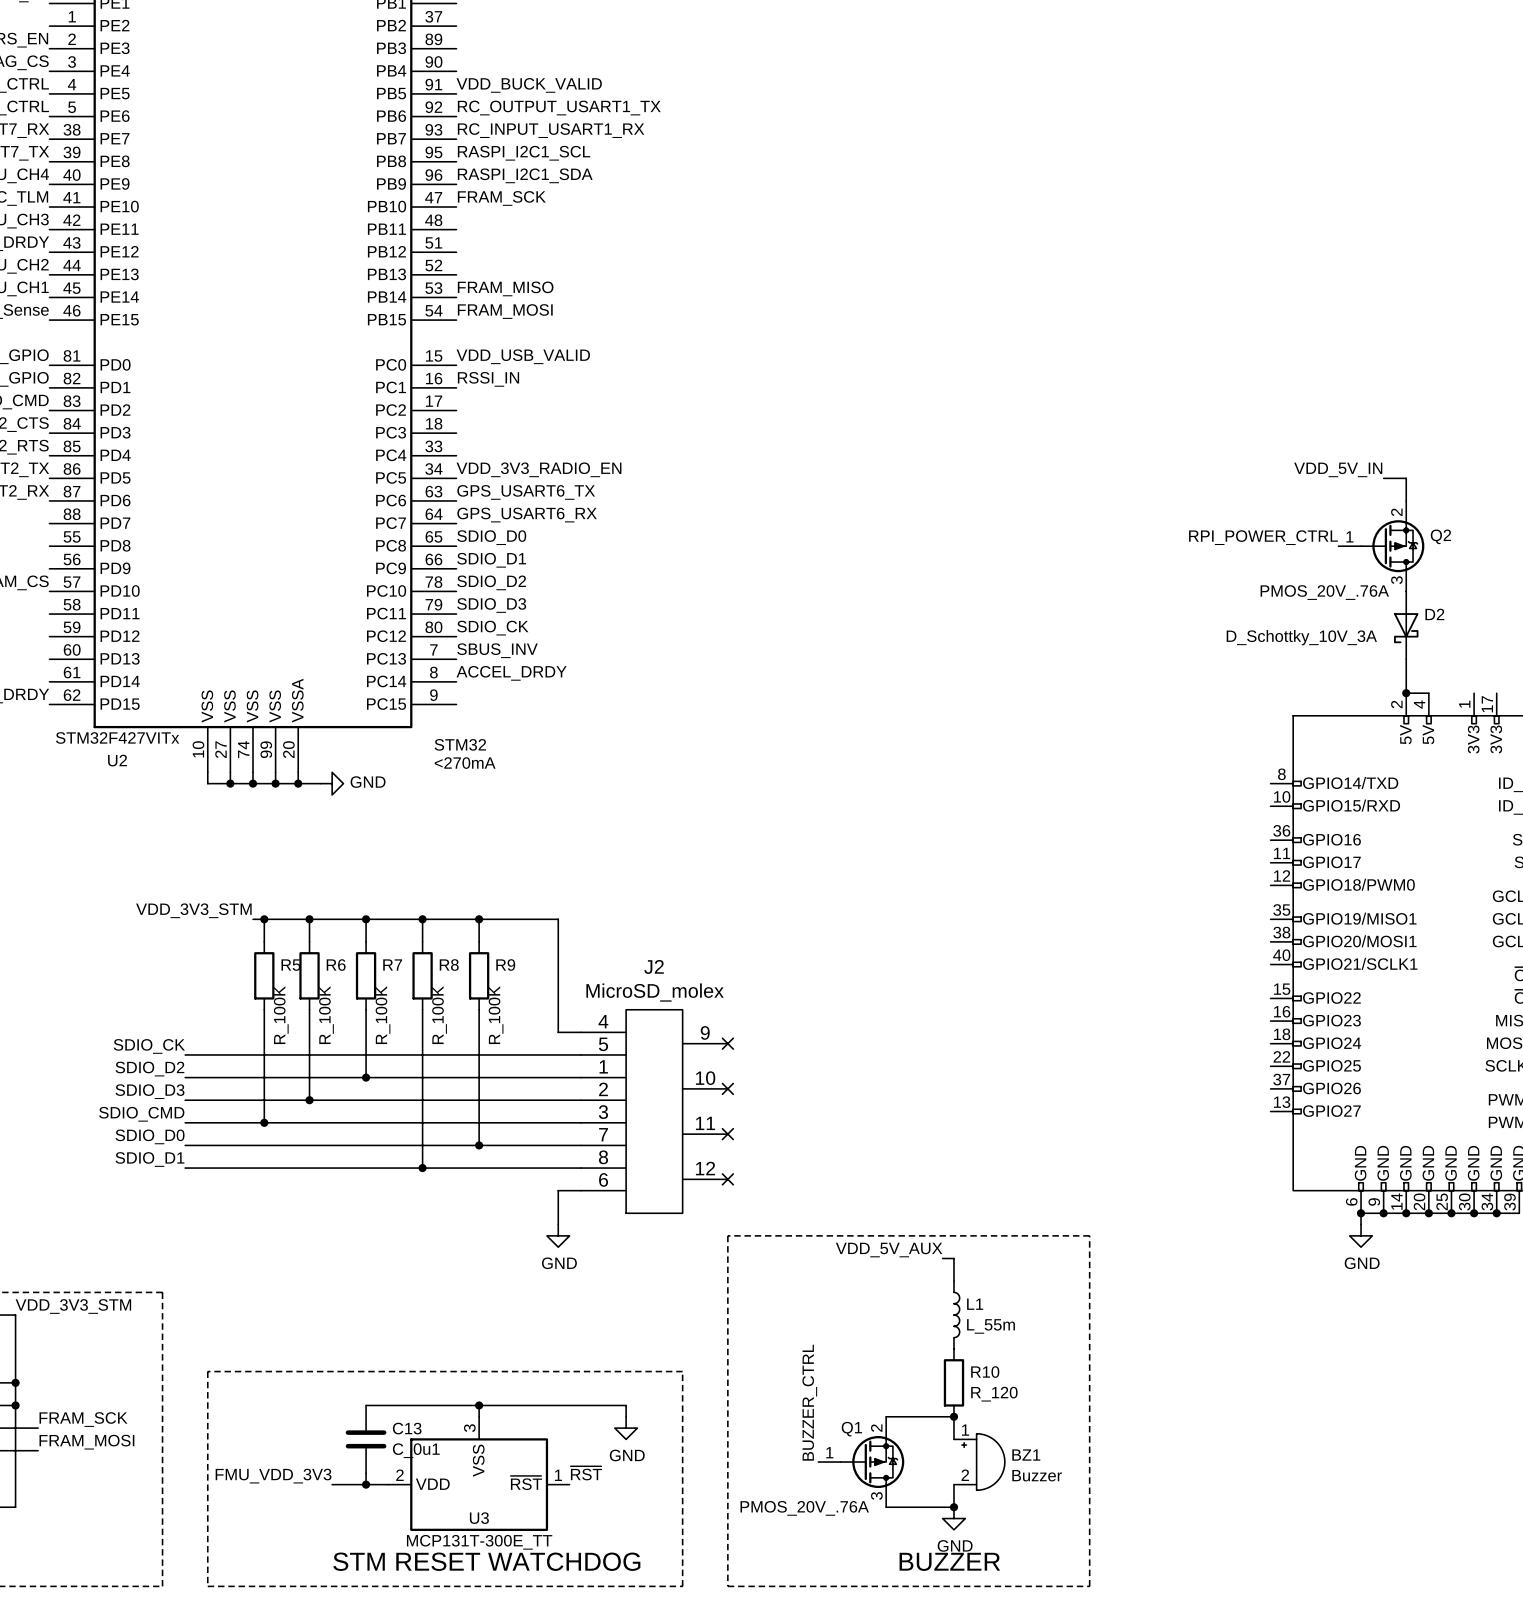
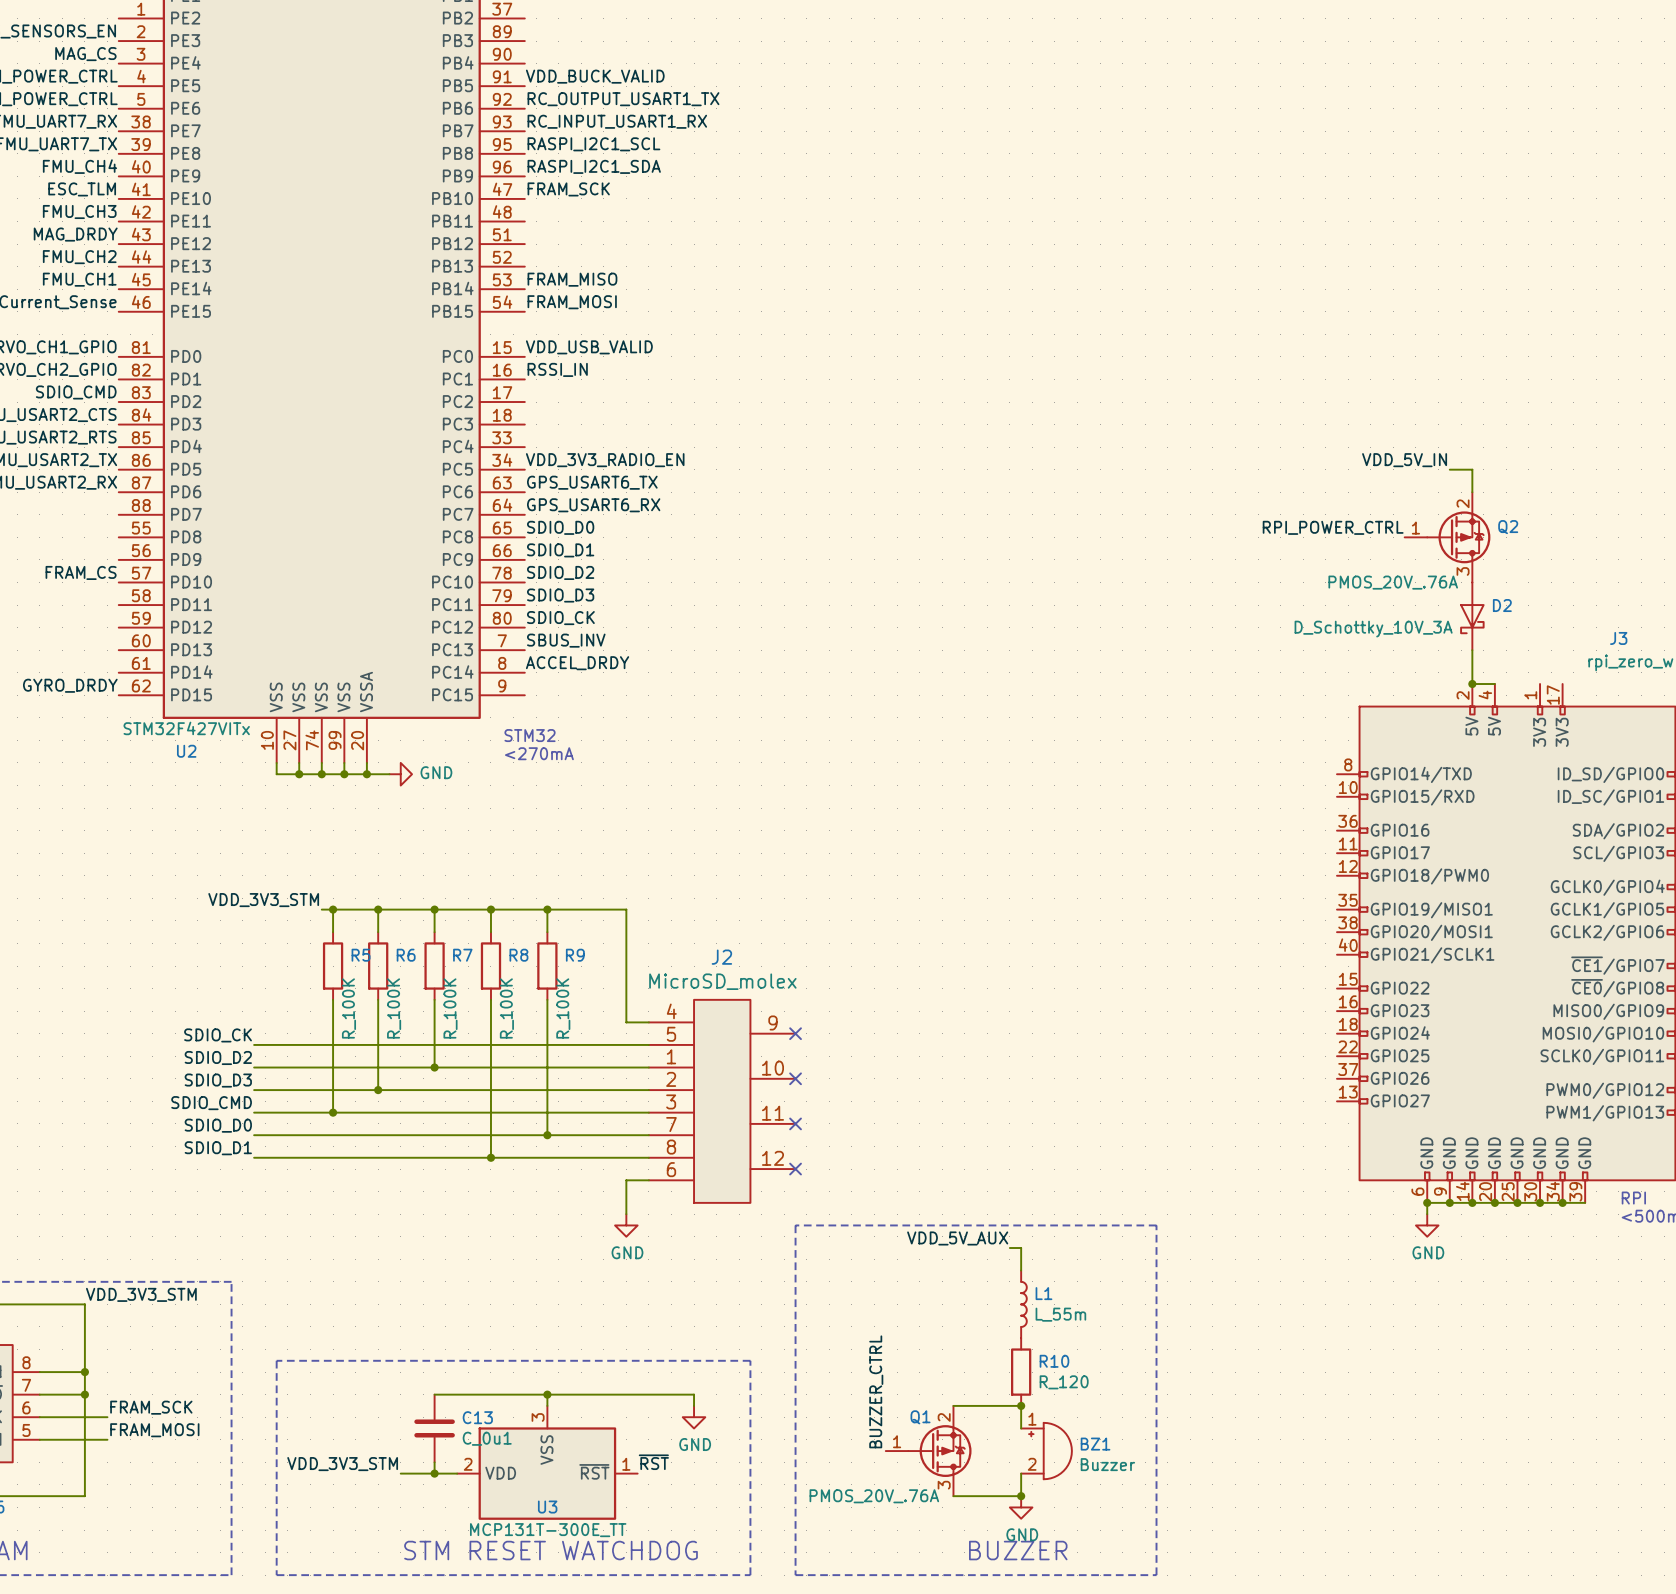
label: FMU_VDD_3V3 (273, 1476) -> VDD_3V3_STM (342, 1464)

